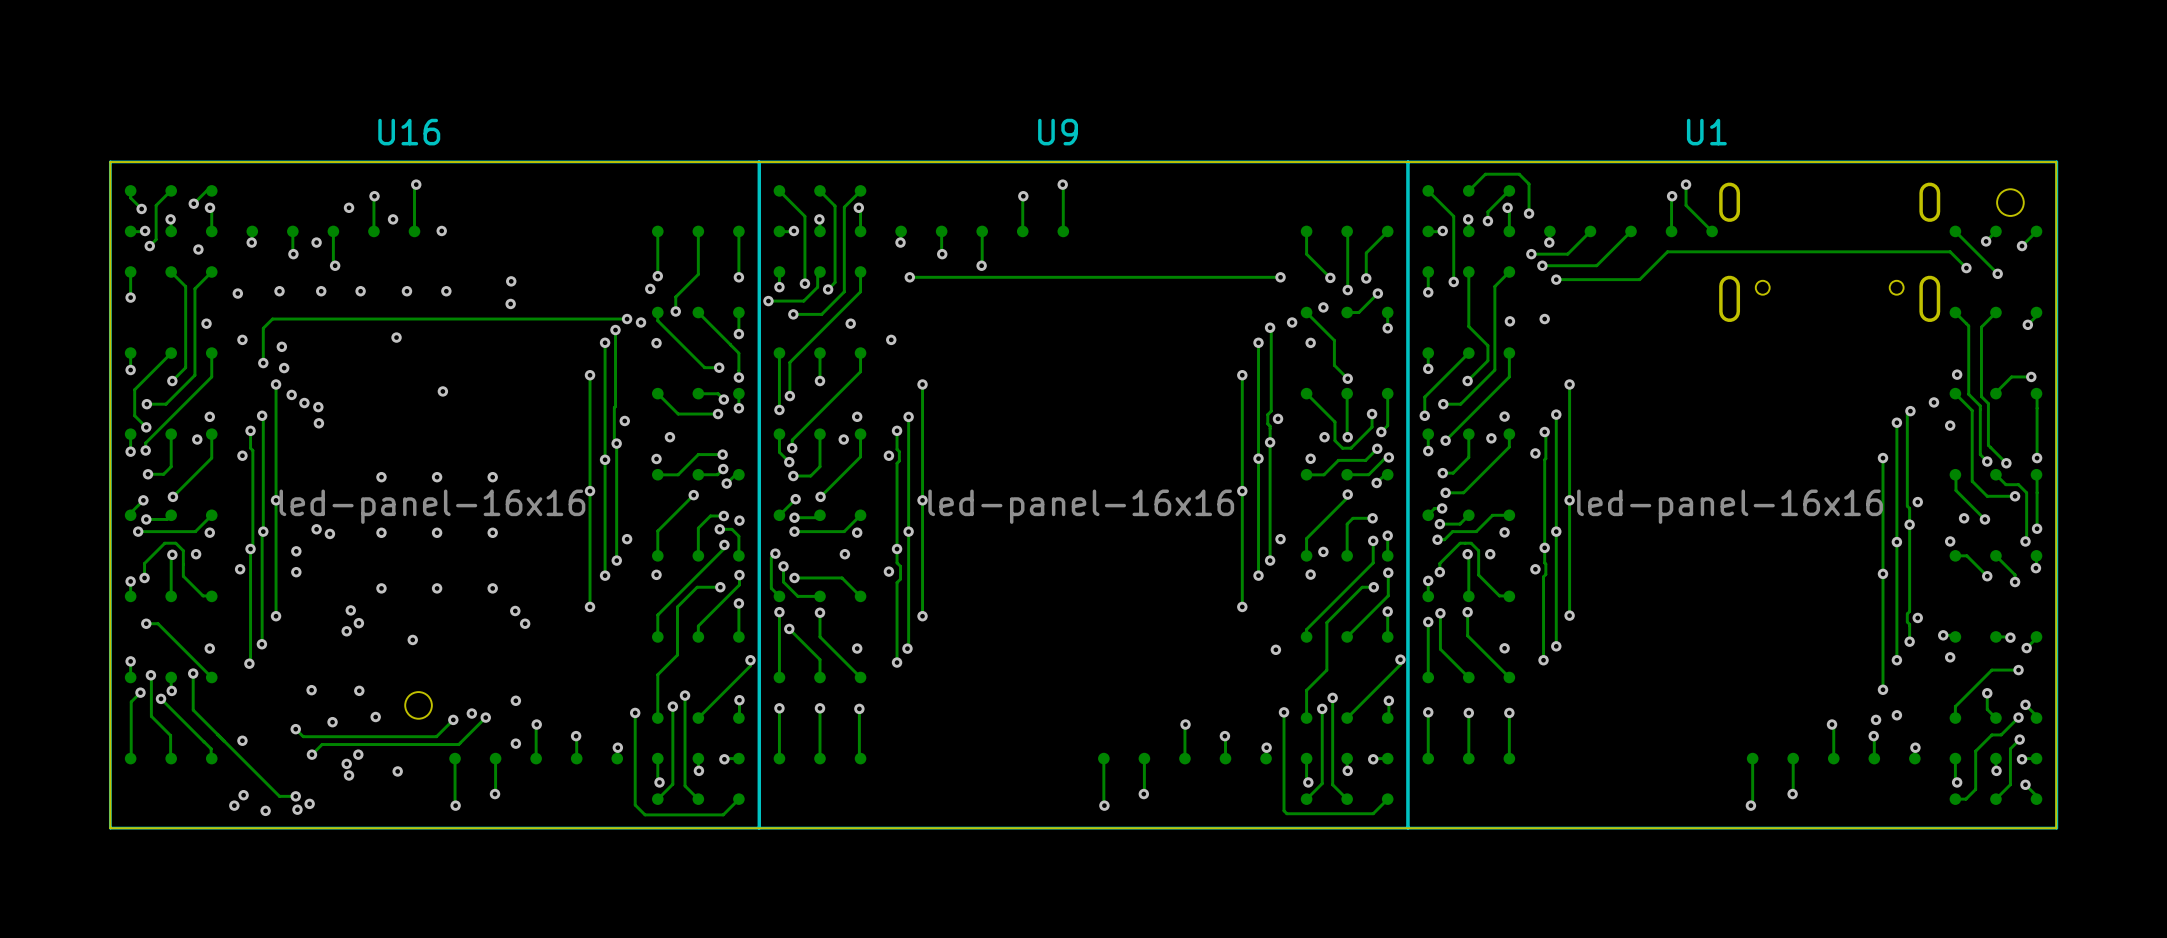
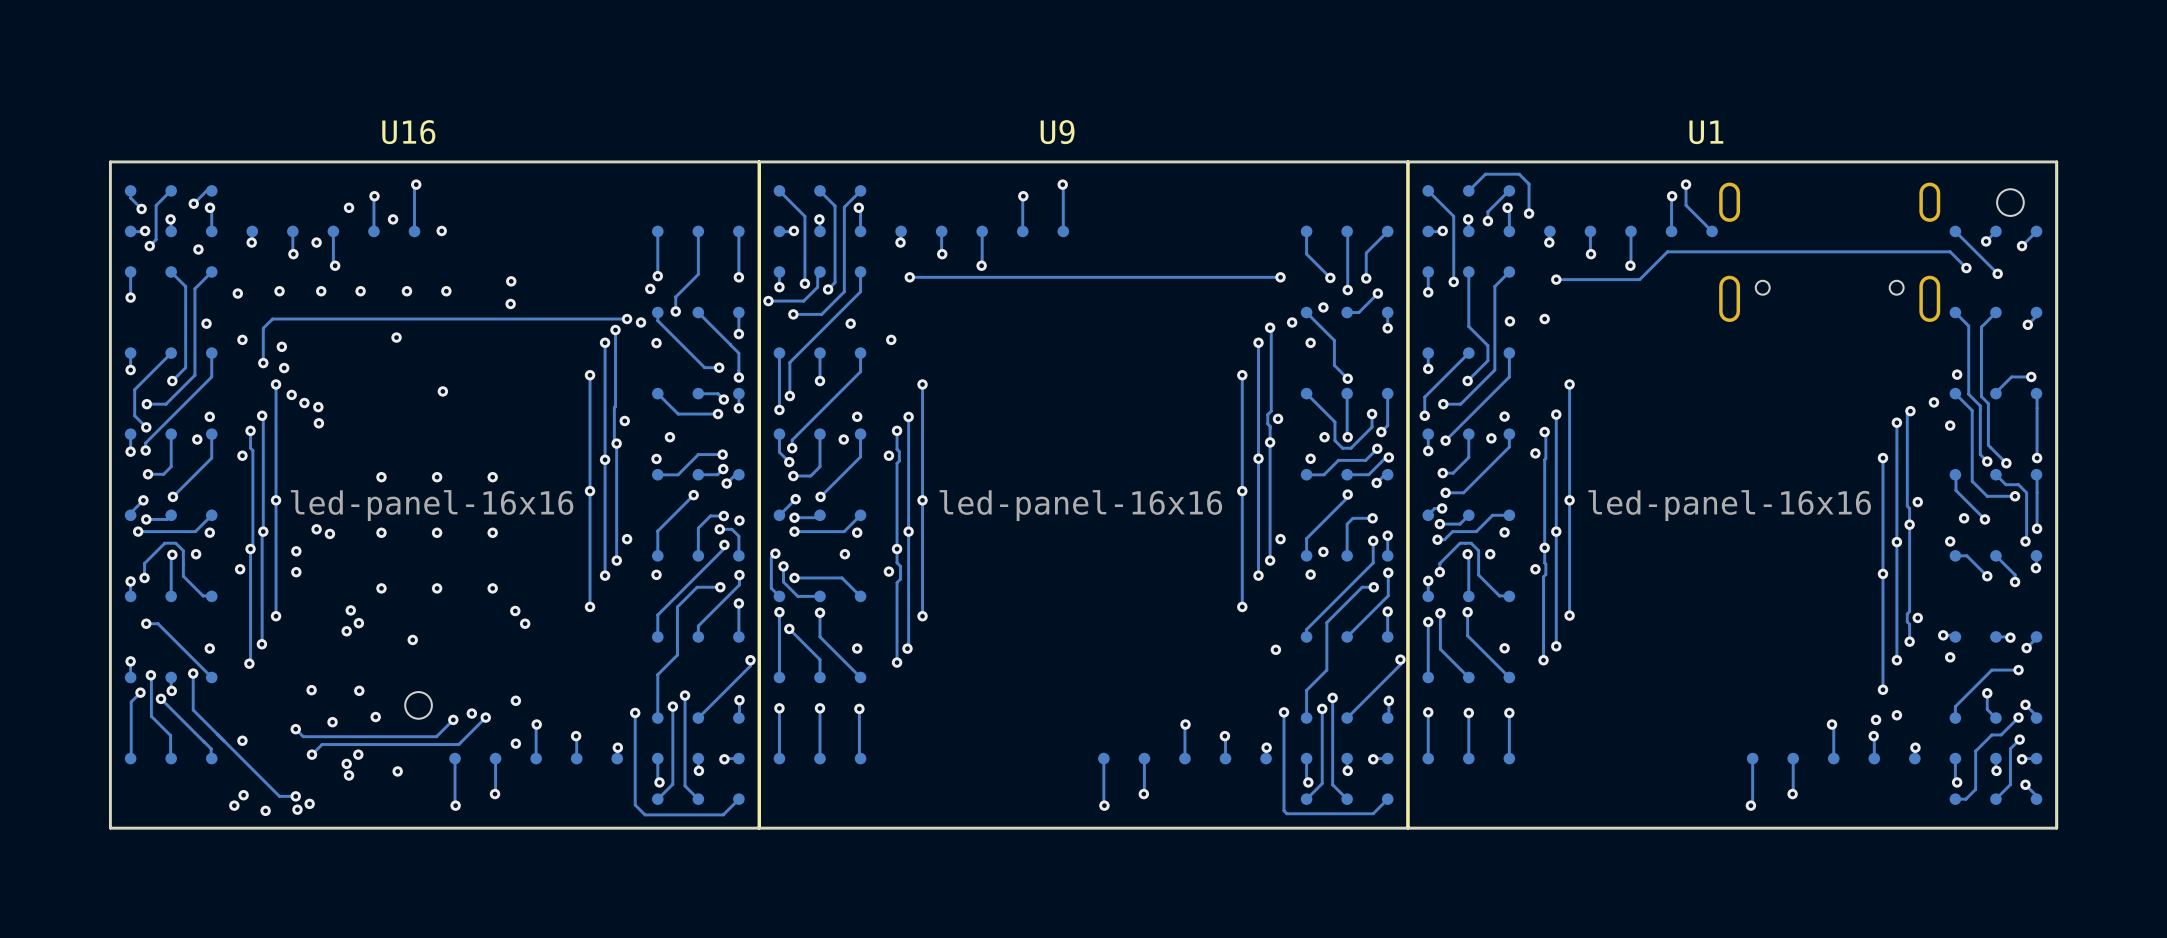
track: (1590, 231) (1567, 254) (1531, 254) -> (1590, 231) (1590, 255)
track: (1631, 231) (1596, 265) (1542, 265) -> (1631, 231) (1631, 267)
via: (1531, 254) -> none
via: none -> (1591, 254)
via: (1542, 265) -> none
via: none -> (1630, 265)

